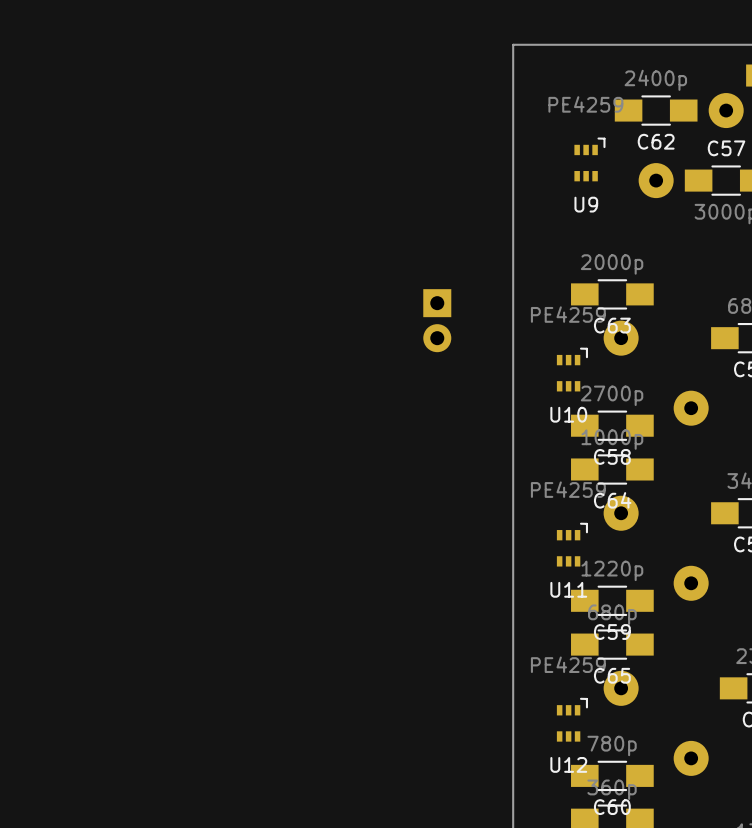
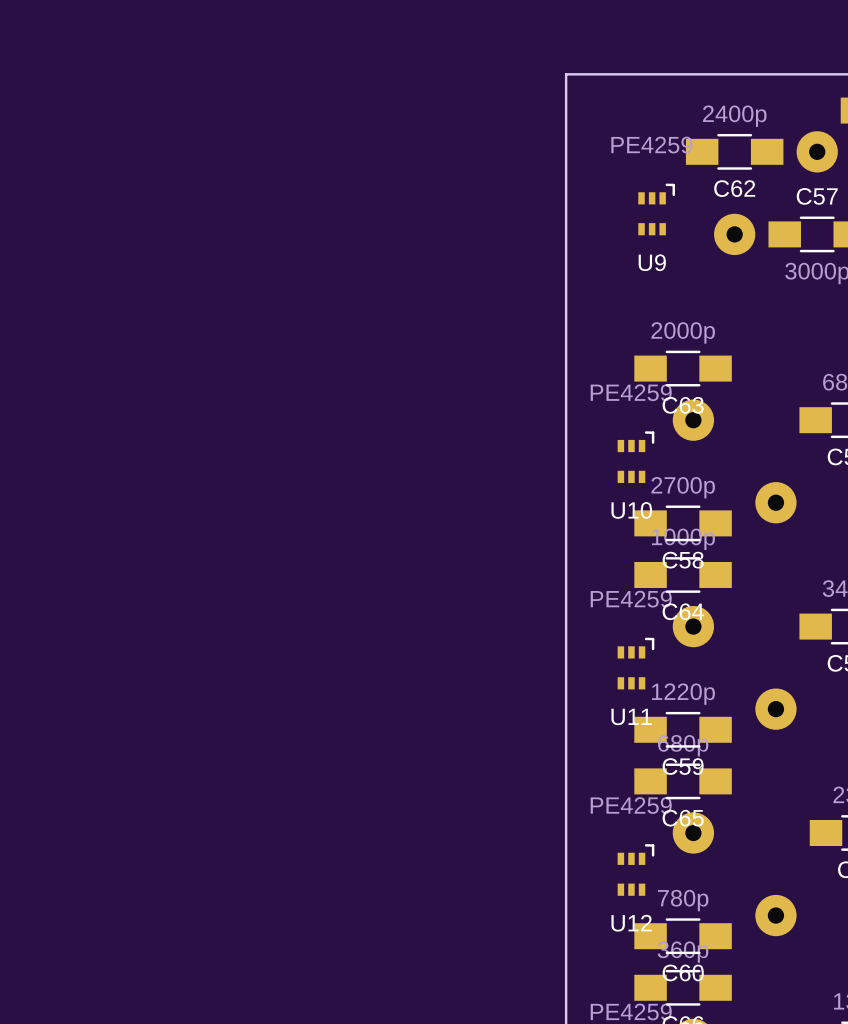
part: (437, 320) -> none

